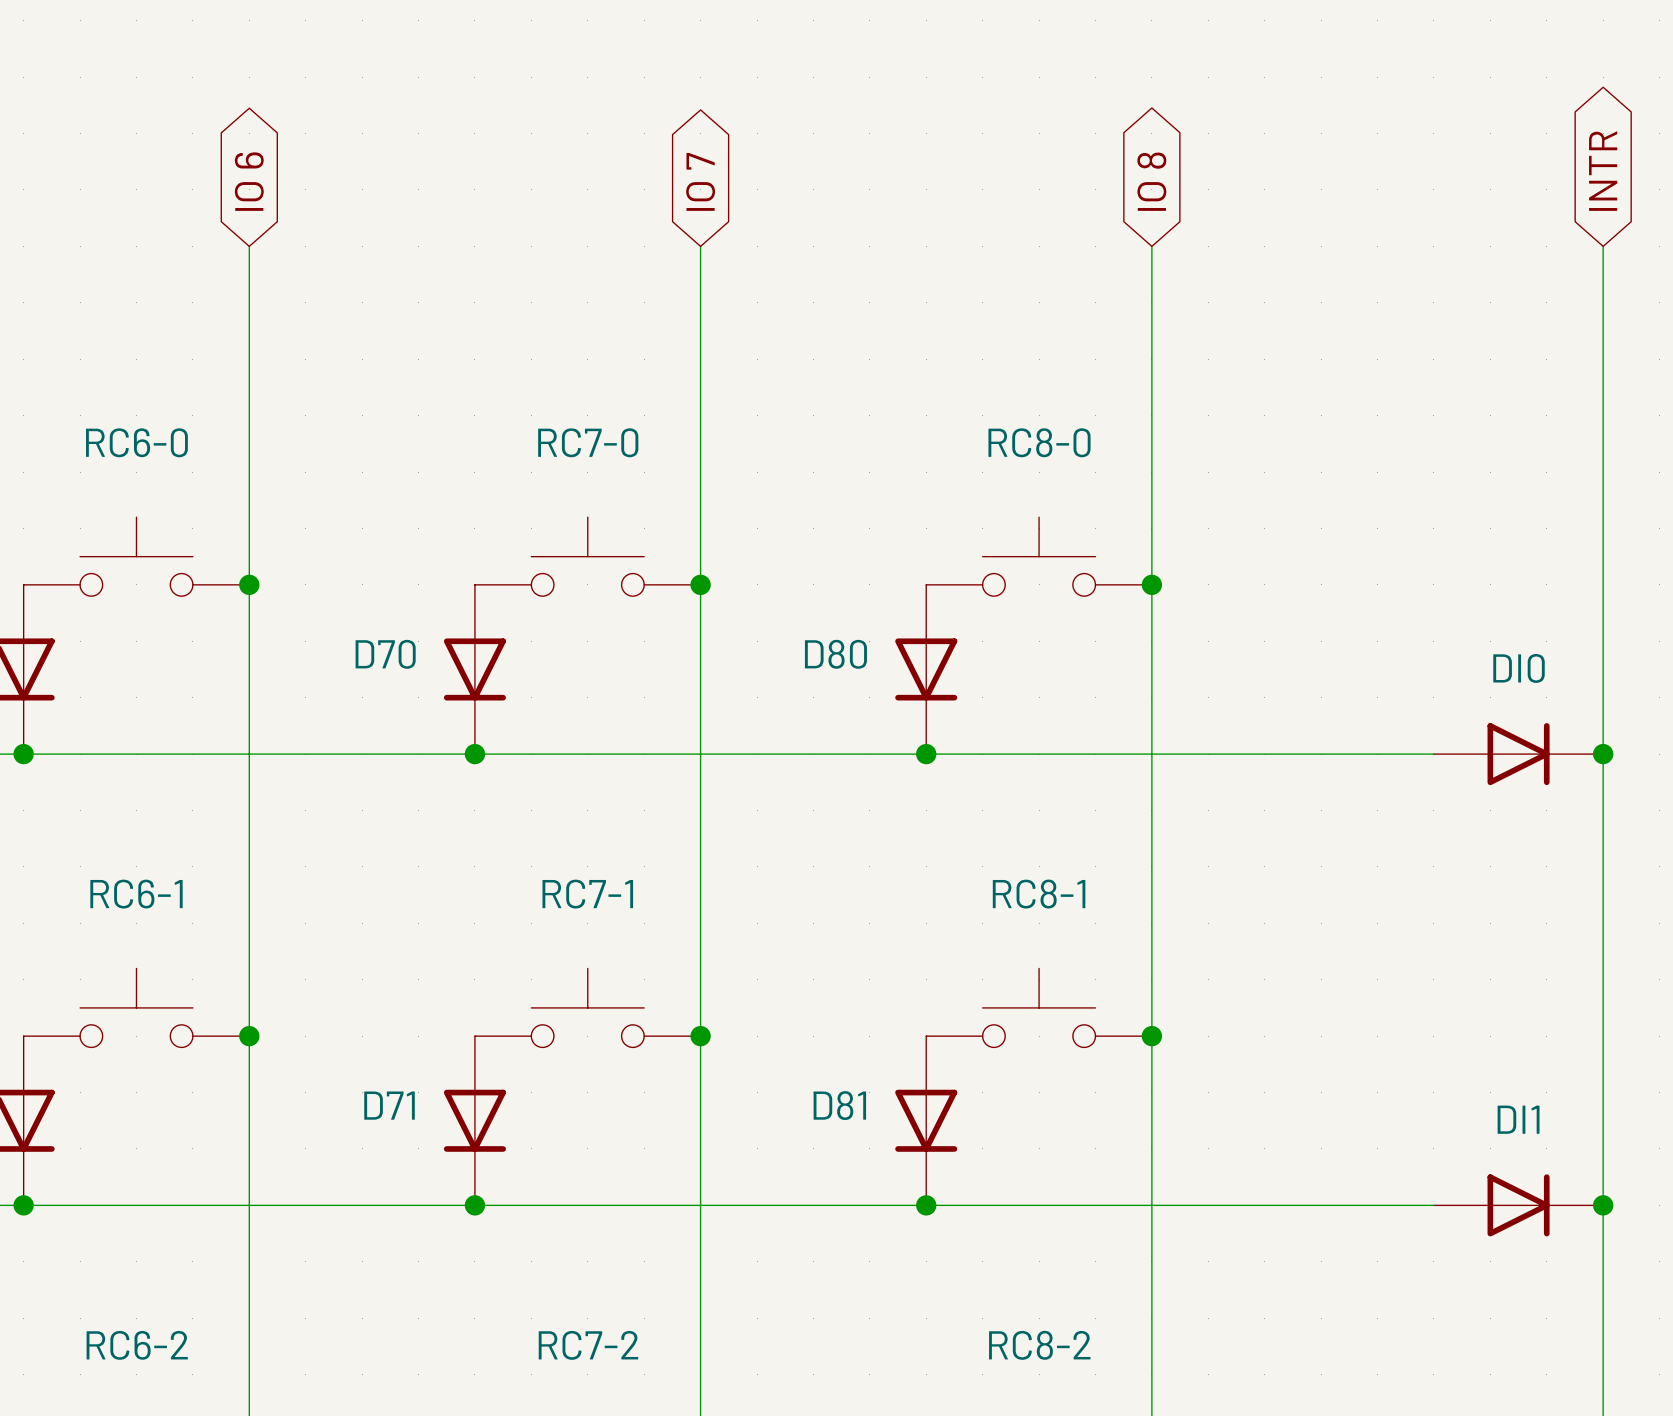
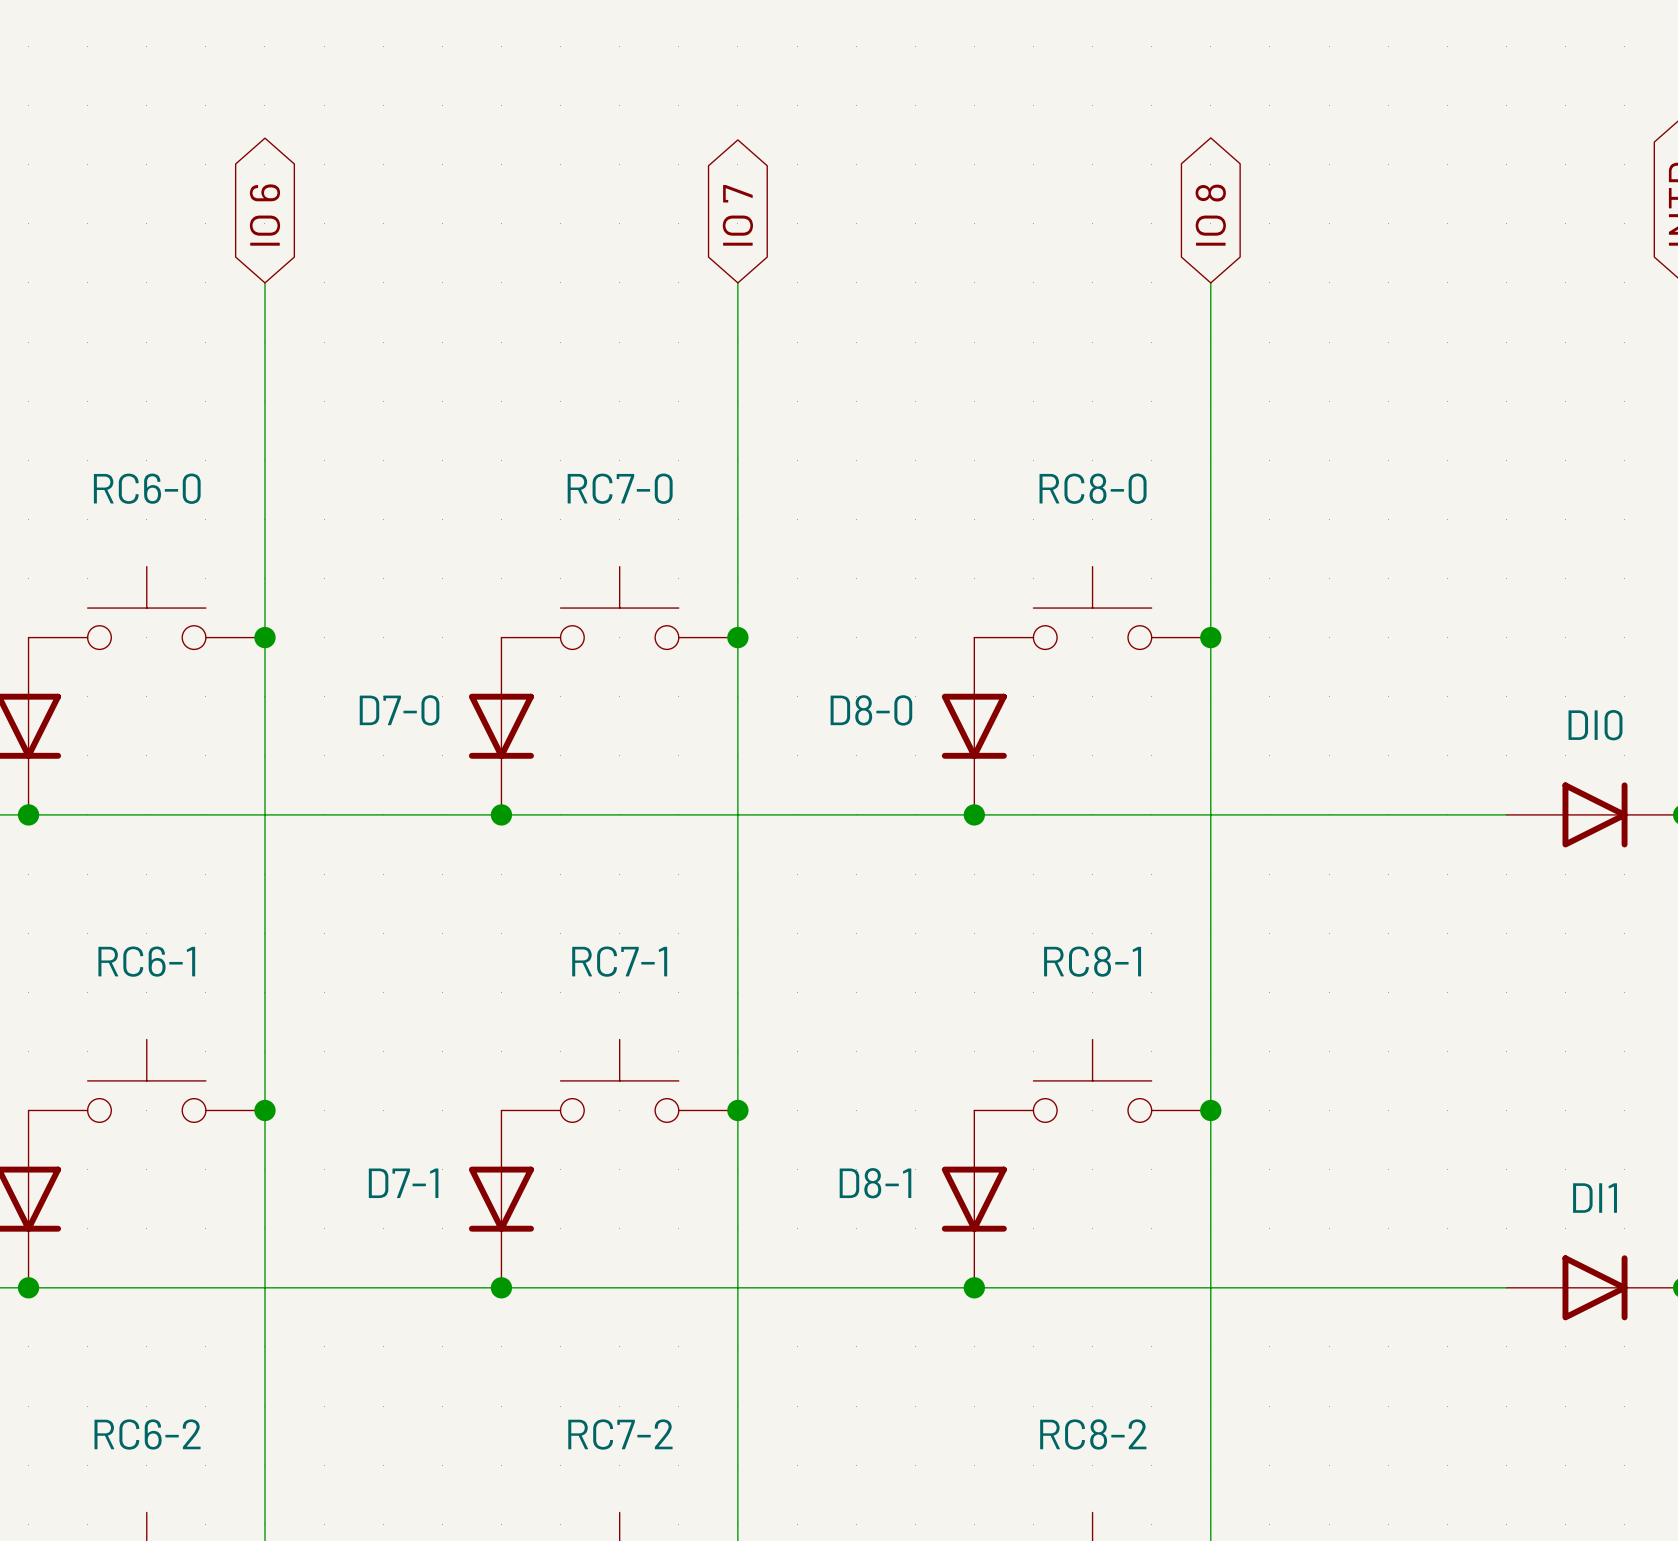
D70 name: D70 (385, 654) -> D7-0 (399, 710)
D80 name: D80 (835, 654) -> D8-0 (871, 710)
D71 name: D71 (389, 1105) -> D7-1 (403, 1183)
D81 name: D81 (839, 1105) -> D8-1 (875, 1183)

